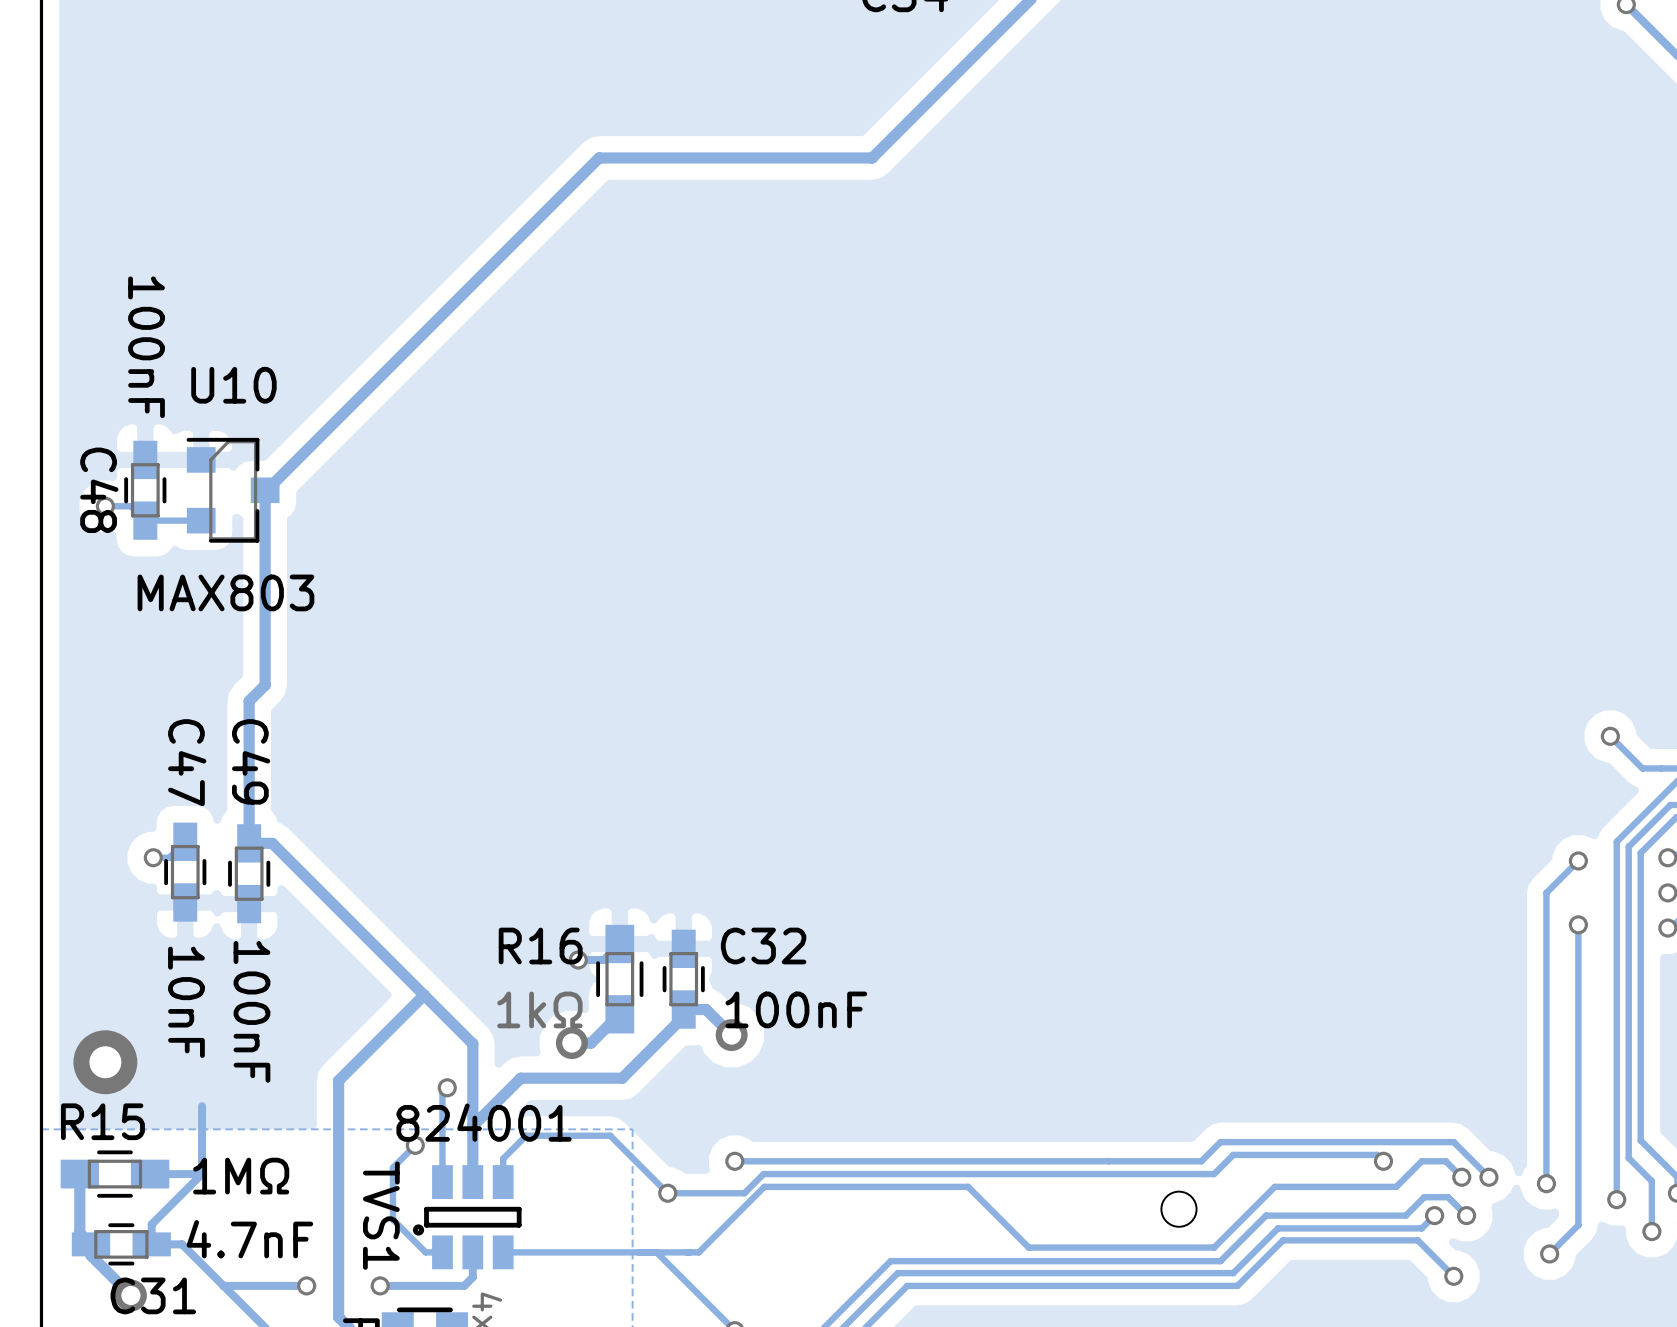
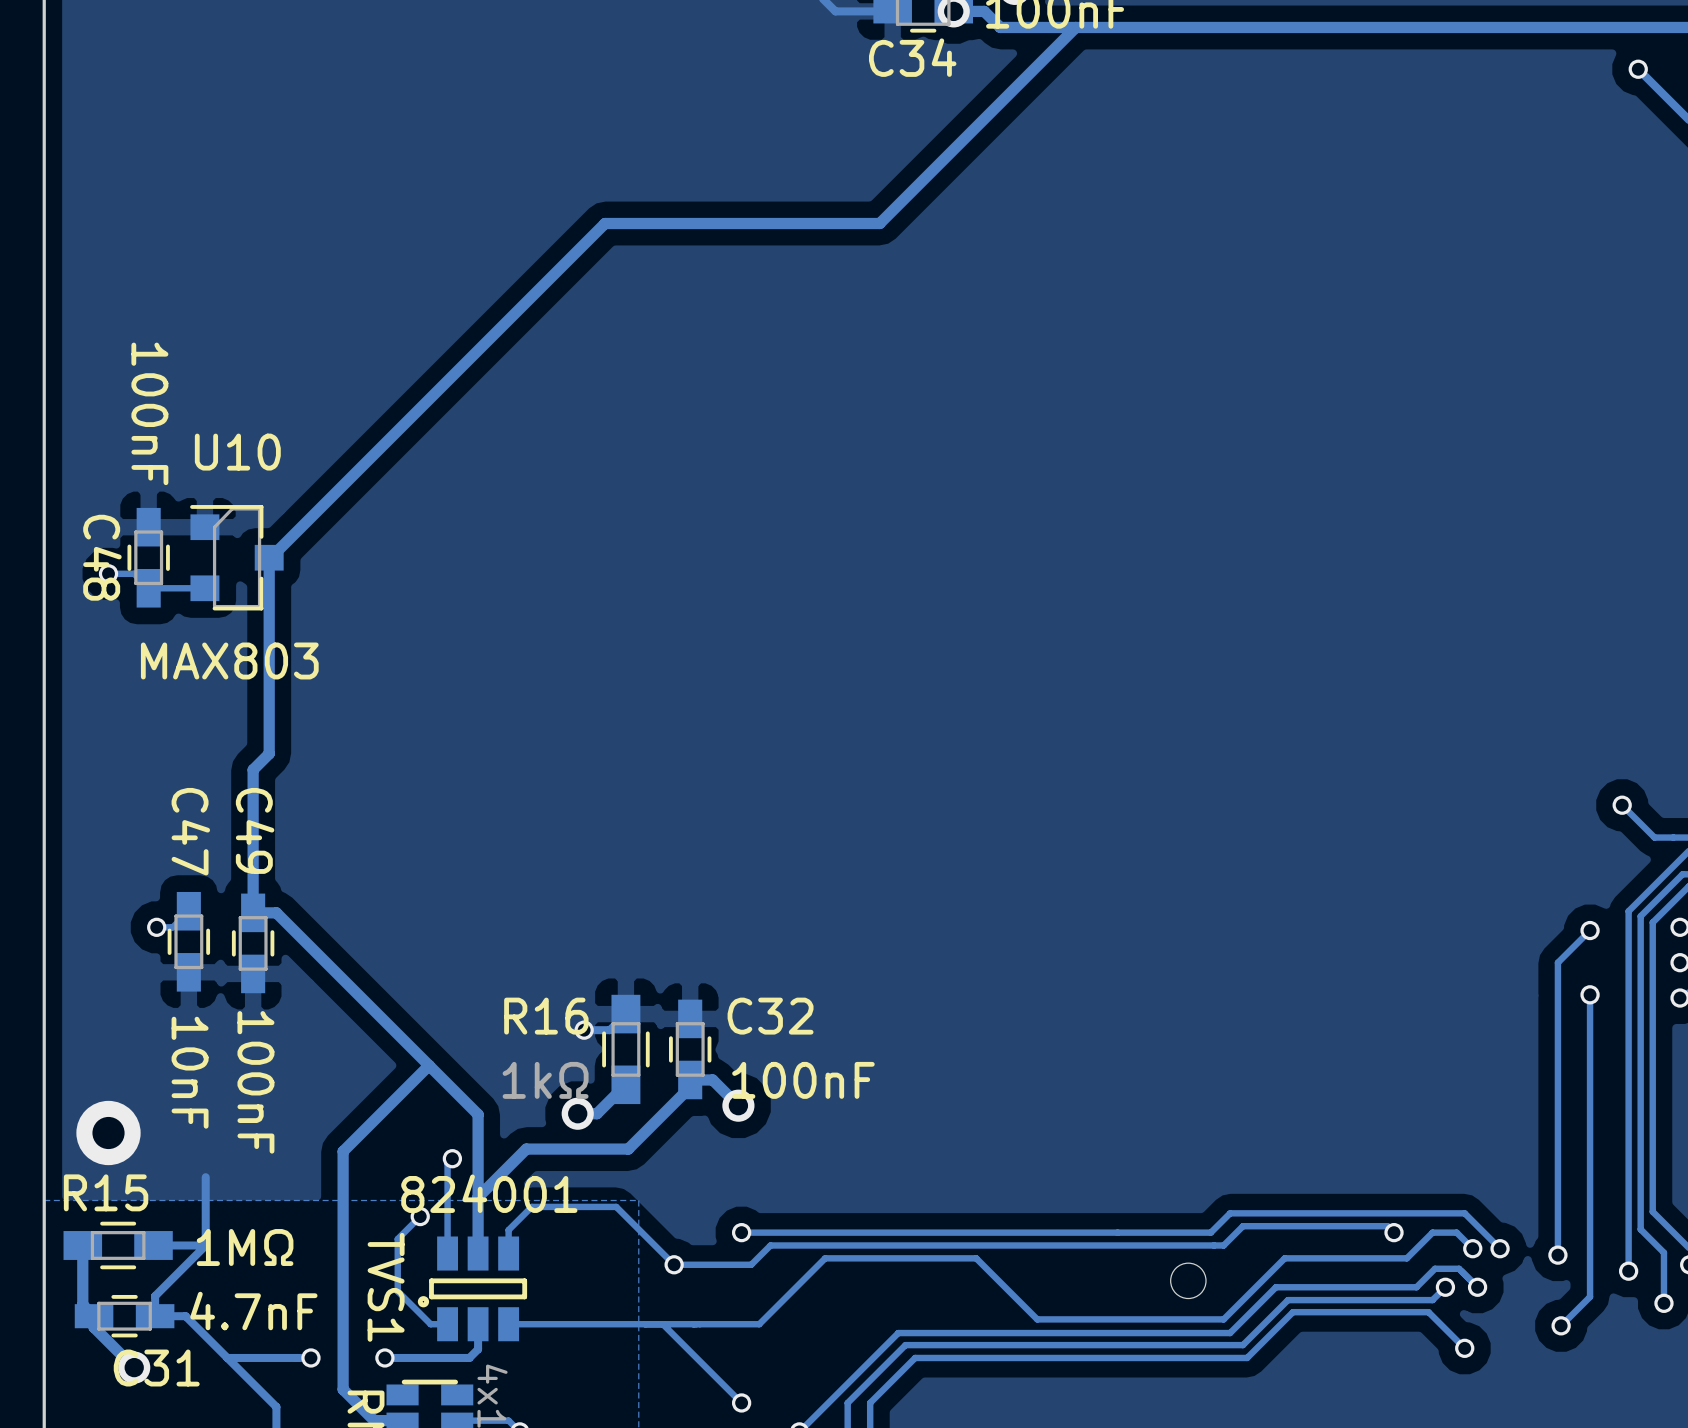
track: (817, 1186) (764, 1186) (698, 1252) -> (825, 1258) (759, 1324) (705, 1324)

